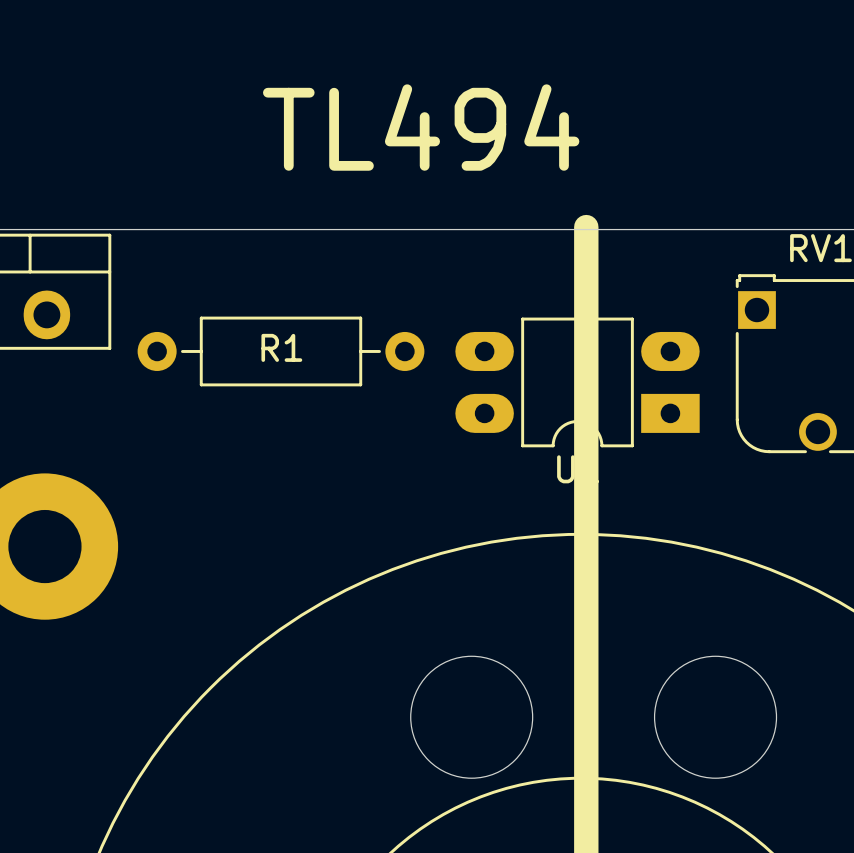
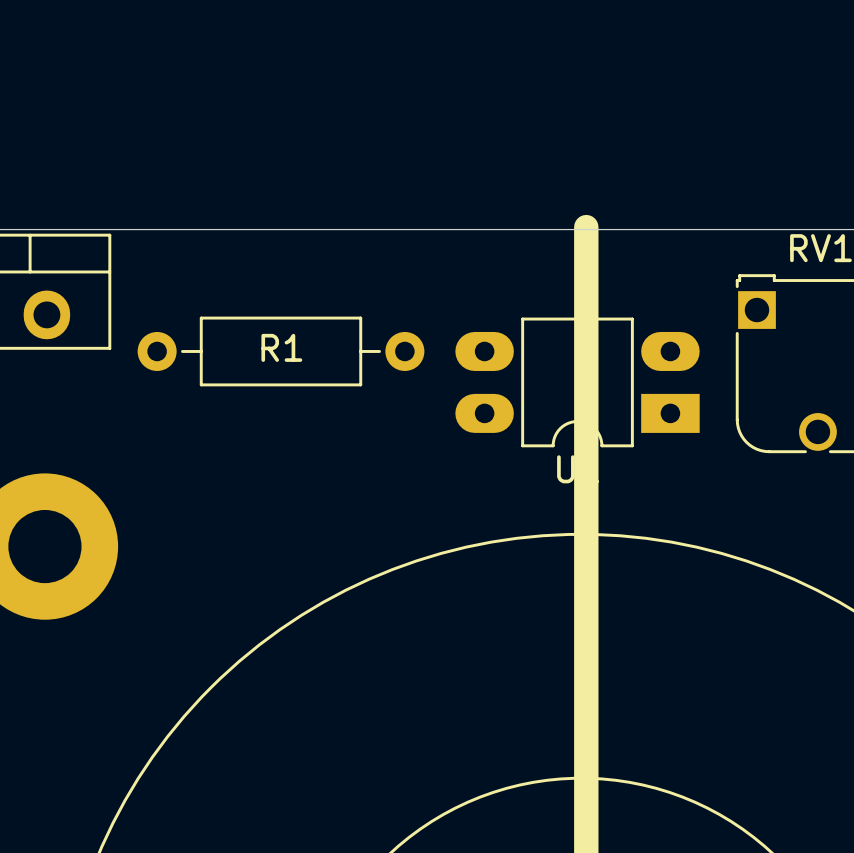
text: TL494 (421, 127) -> none
round board edge: [410, 655, 534, 779] -> none
round board edge: [653, 655, 778, 779] -> none

